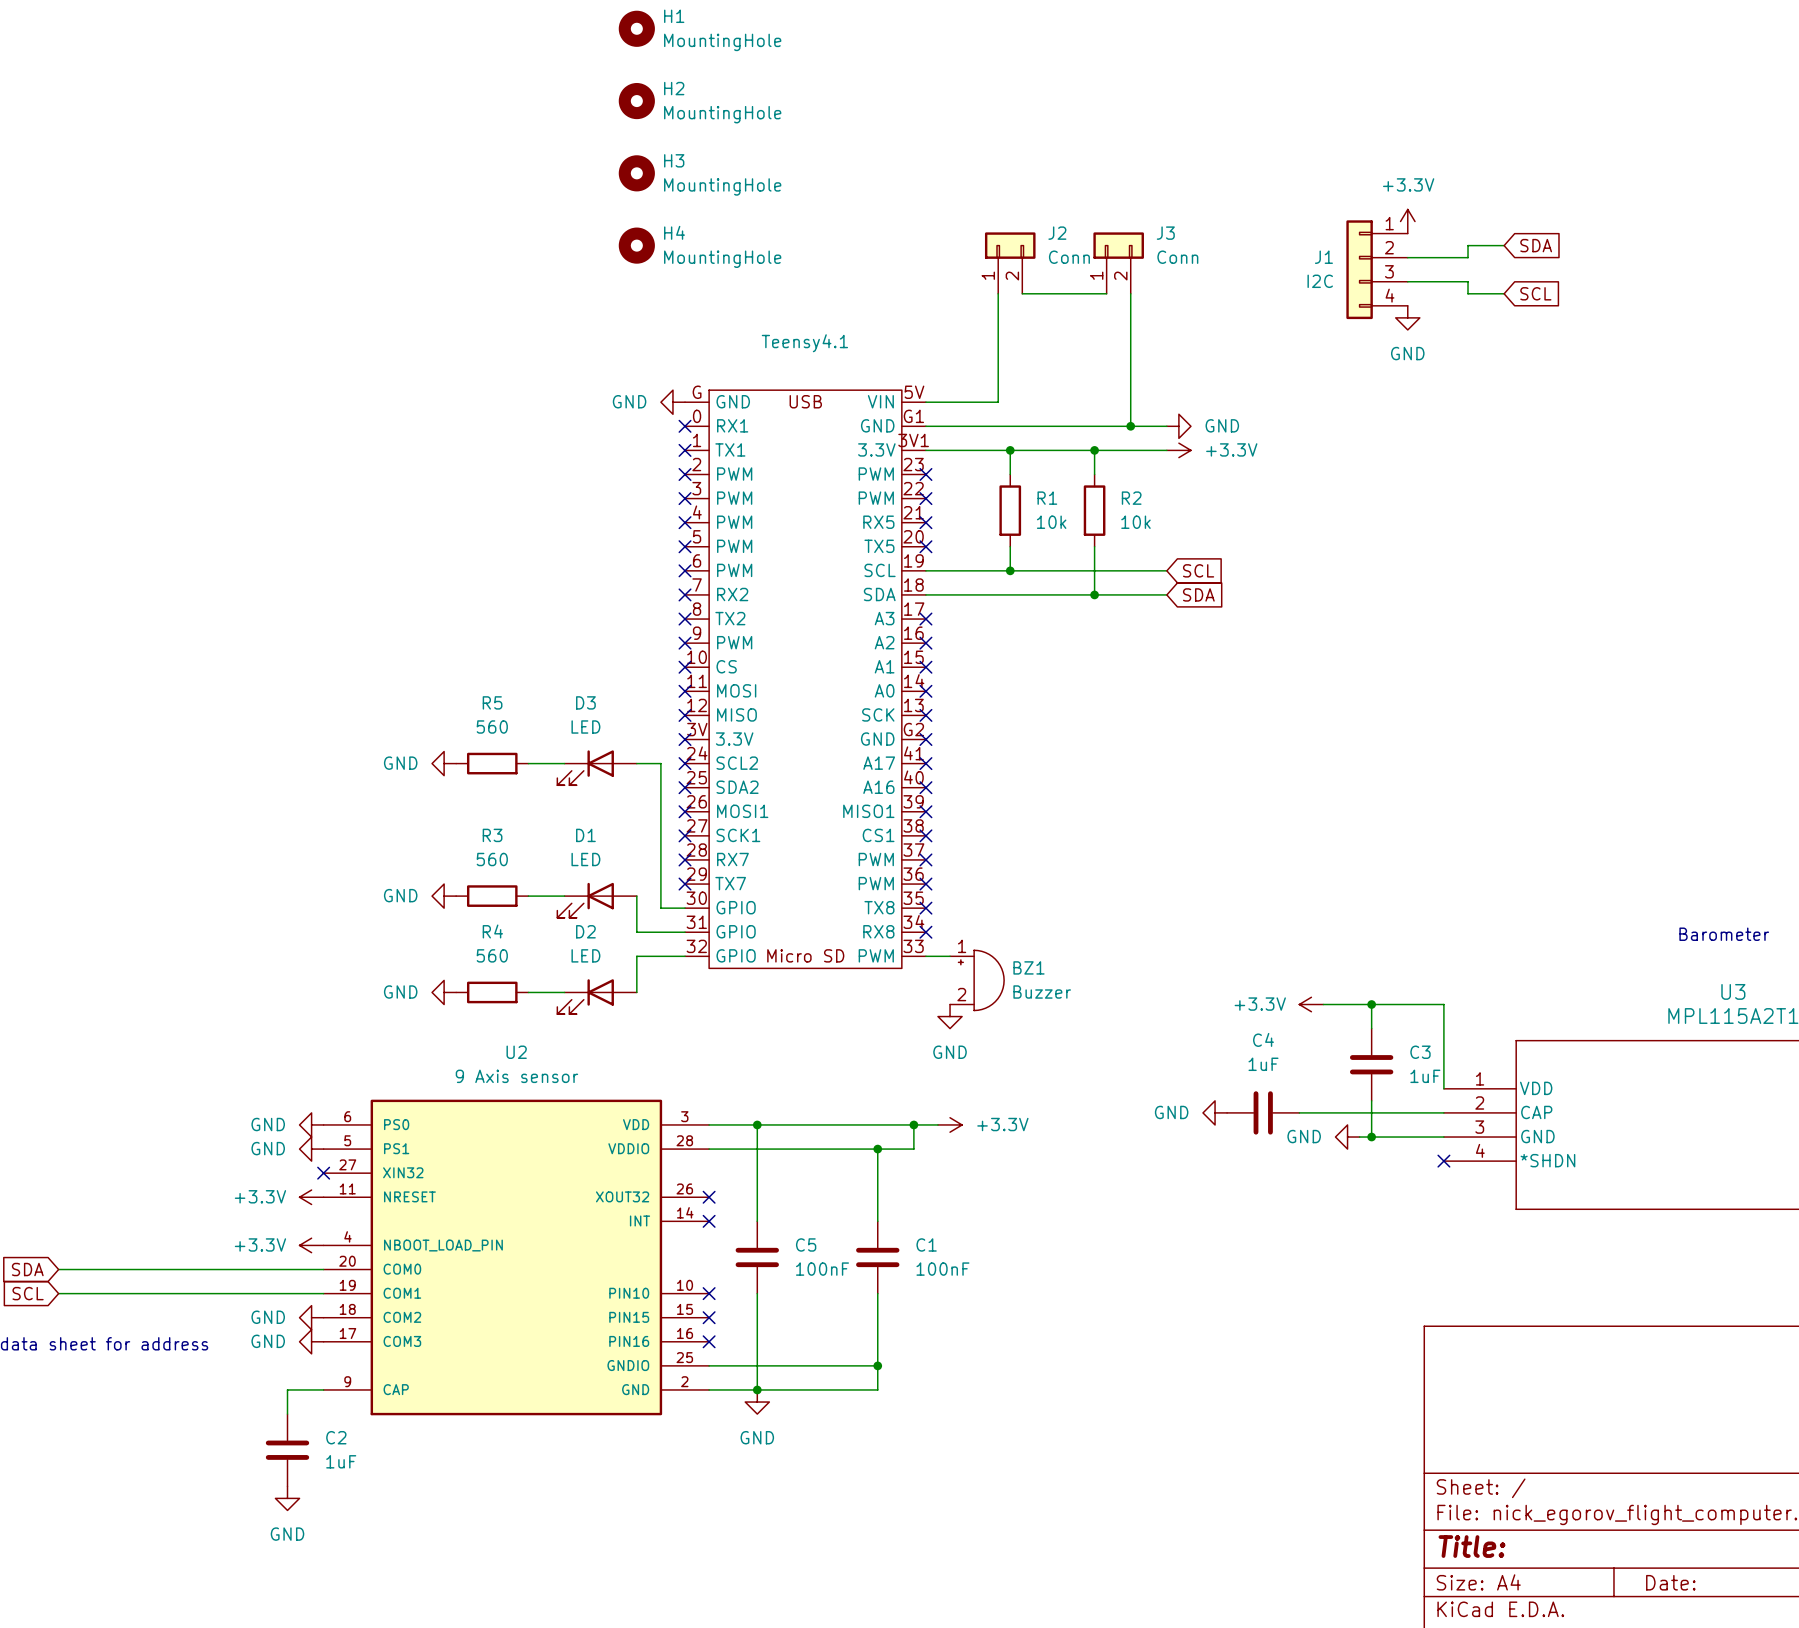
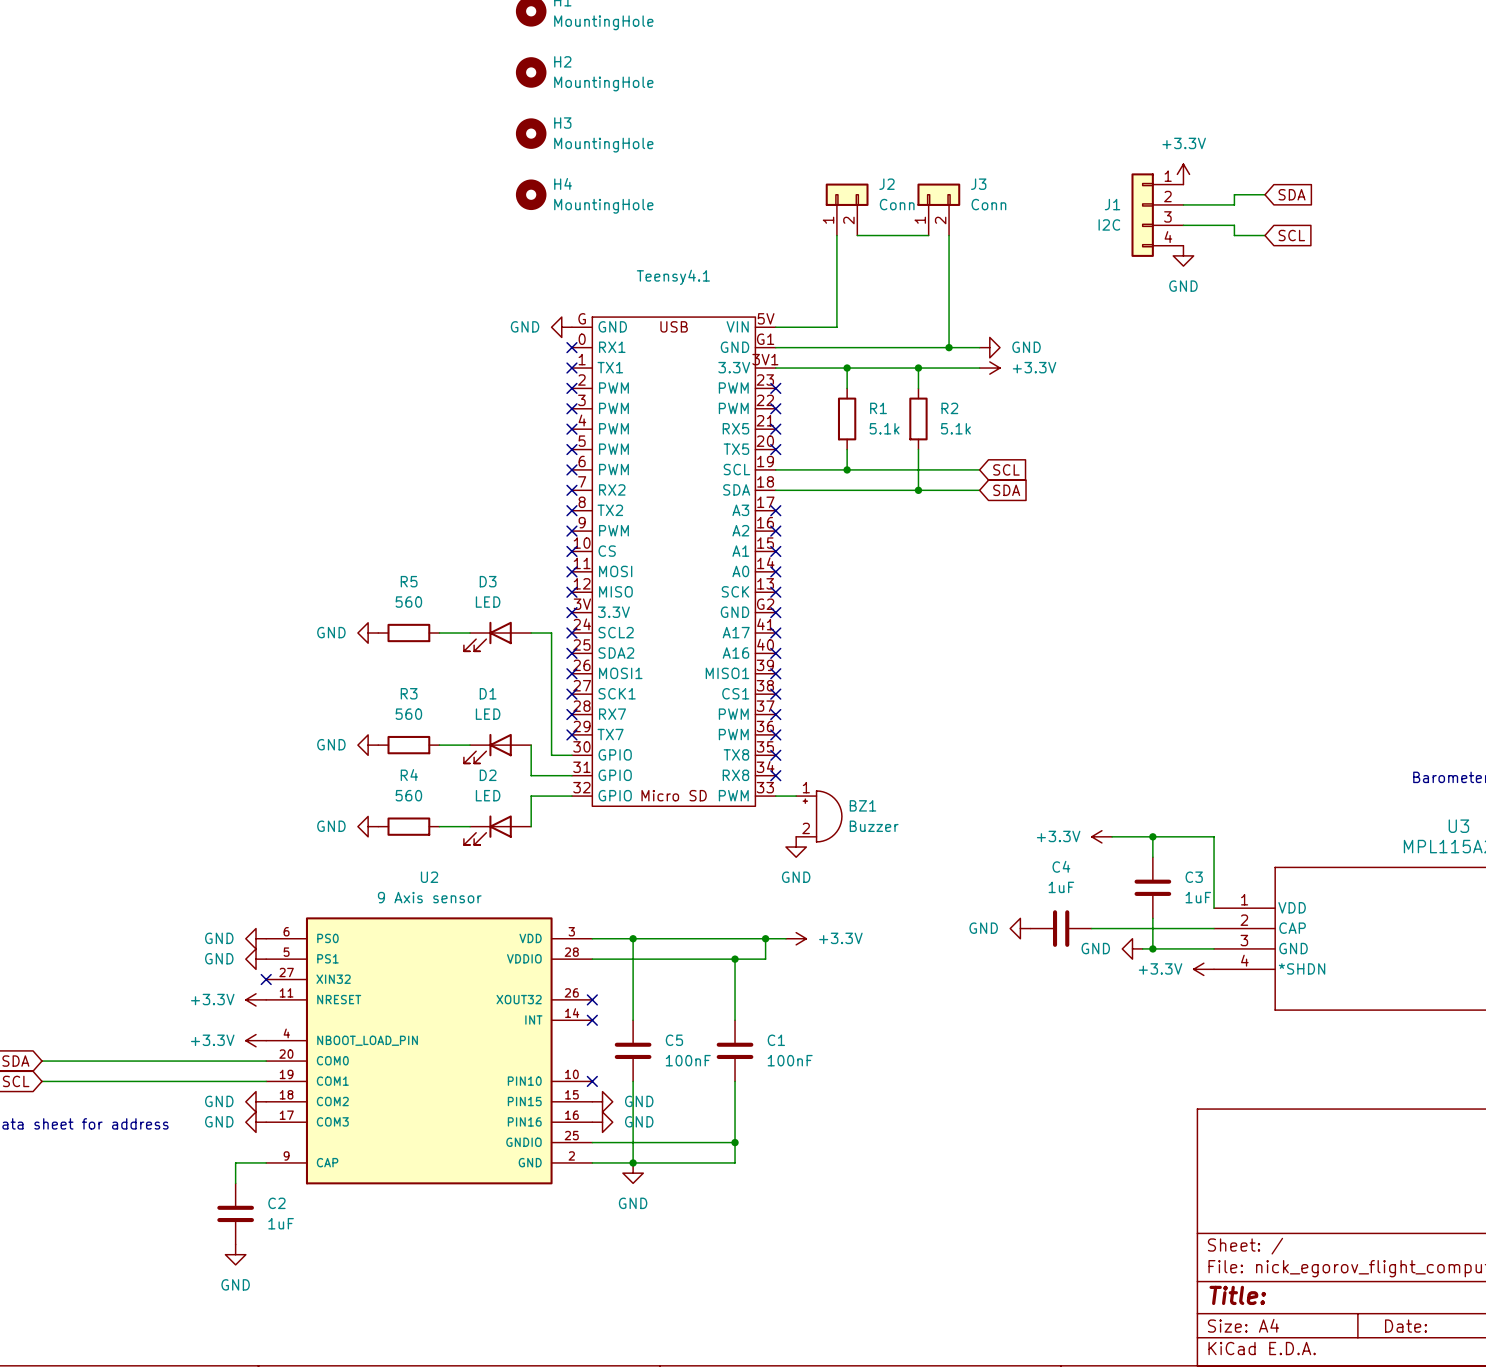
R1 value: 10k (1051, 522) -> 5.1k (884, 428)
R2 value: 10k (1135, 522) -> 5.1k (955, 428)
power symbol: none -> +3.3V (1203, 969)
no-connect mark: (1443, 1161) -> none
no-connect mark: (709, 1317) -> none
power symbol: none -> GND (602, 1101)
no-connect mark: (709, 1341) -> none
power symbol: none -> GND (602, 1122)

